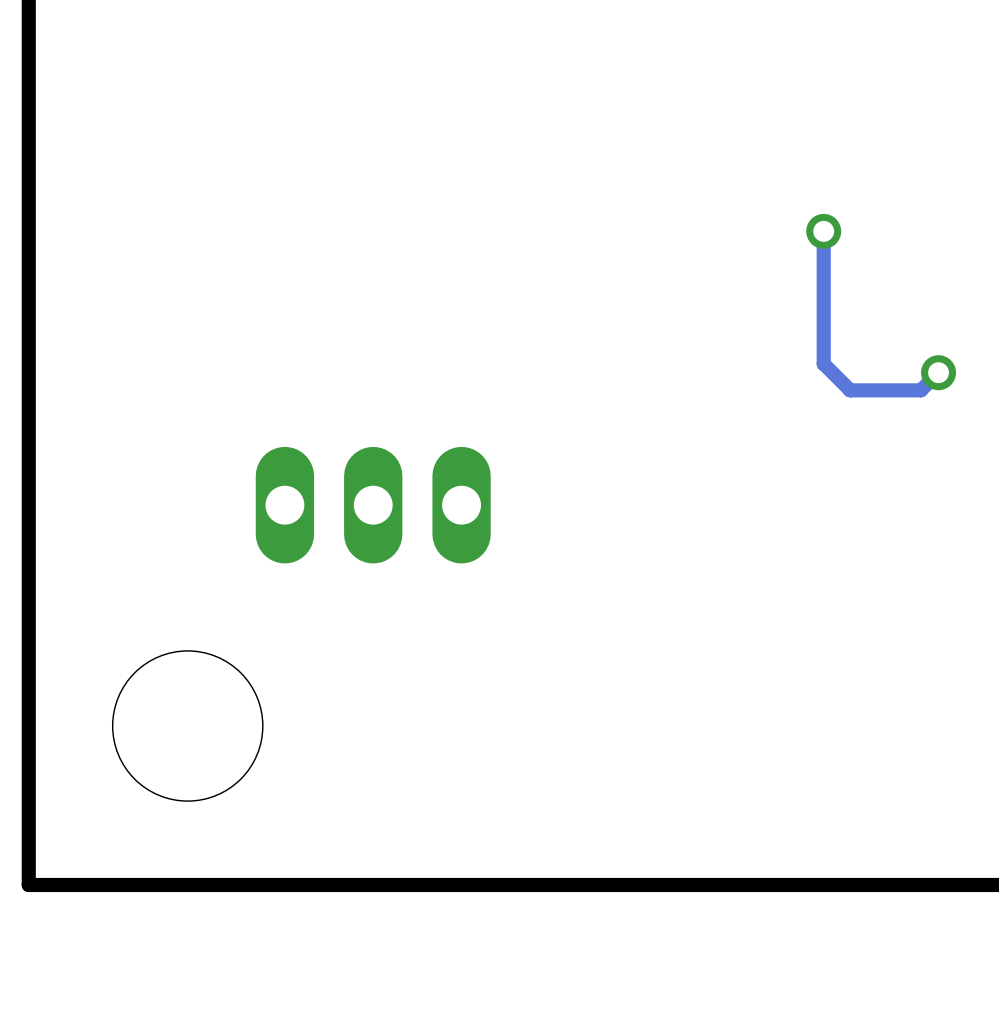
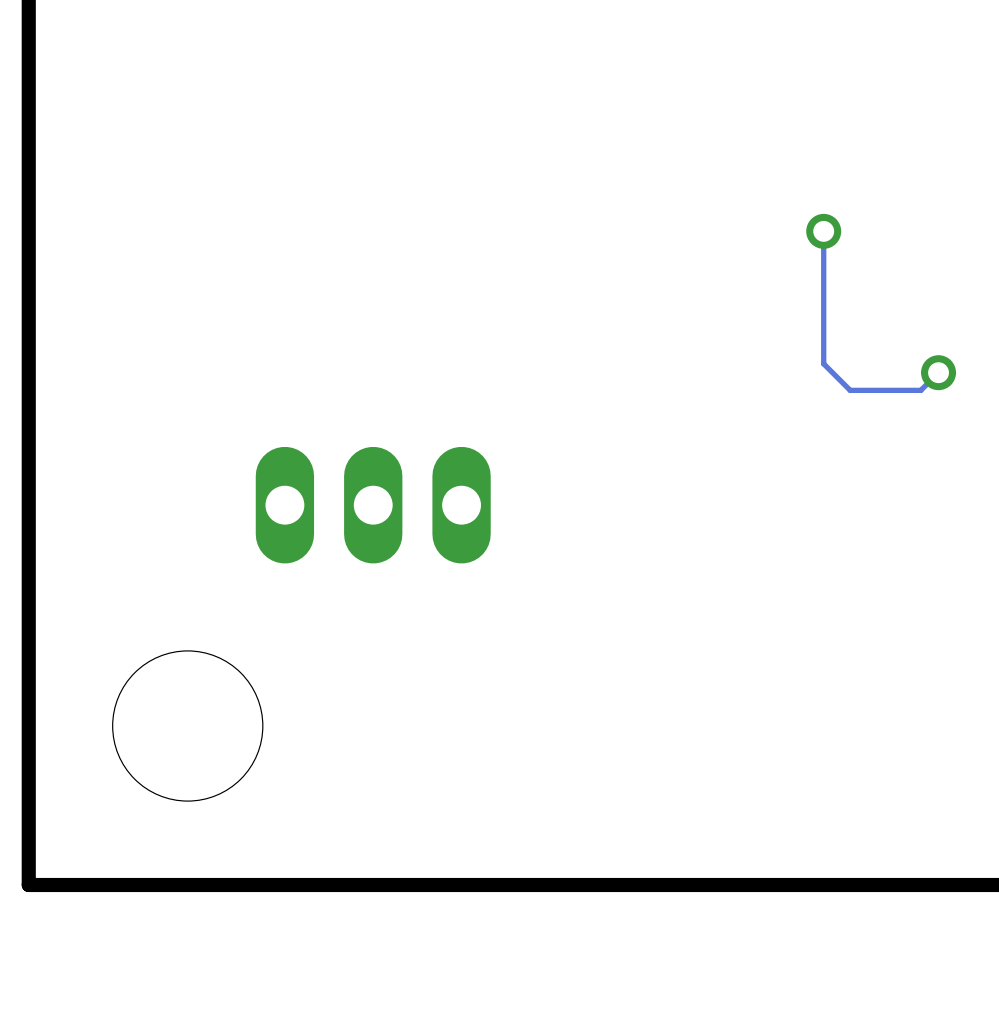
track width: thick (823, 231) (823, 363) (850, 390) (920, 390) (938, 372) -> thin (823, 231) (823, 363) (850, 390) (920, 390) (938, 372)

